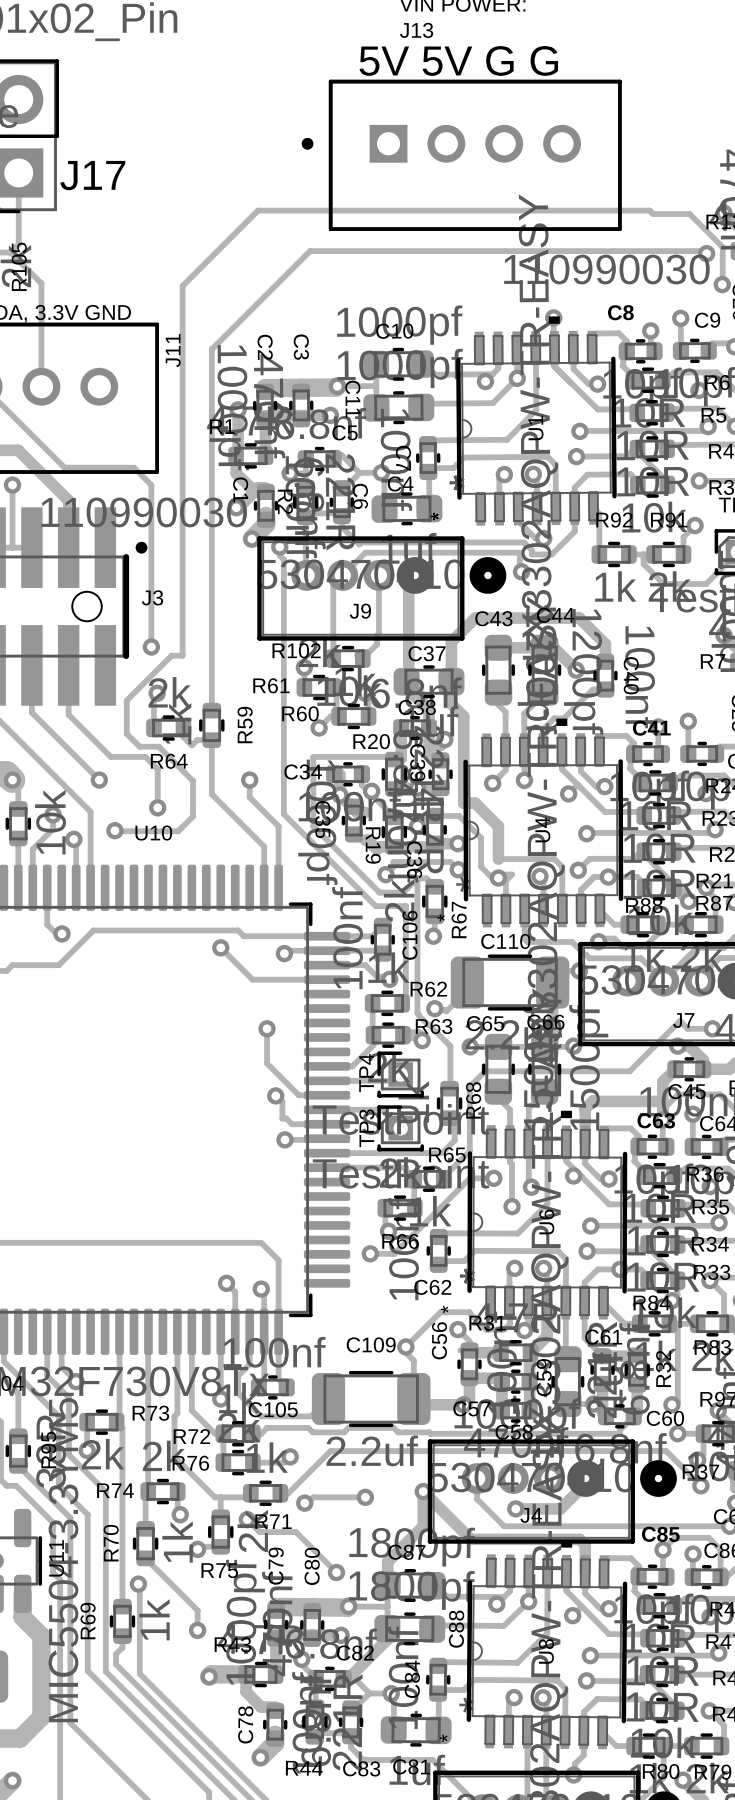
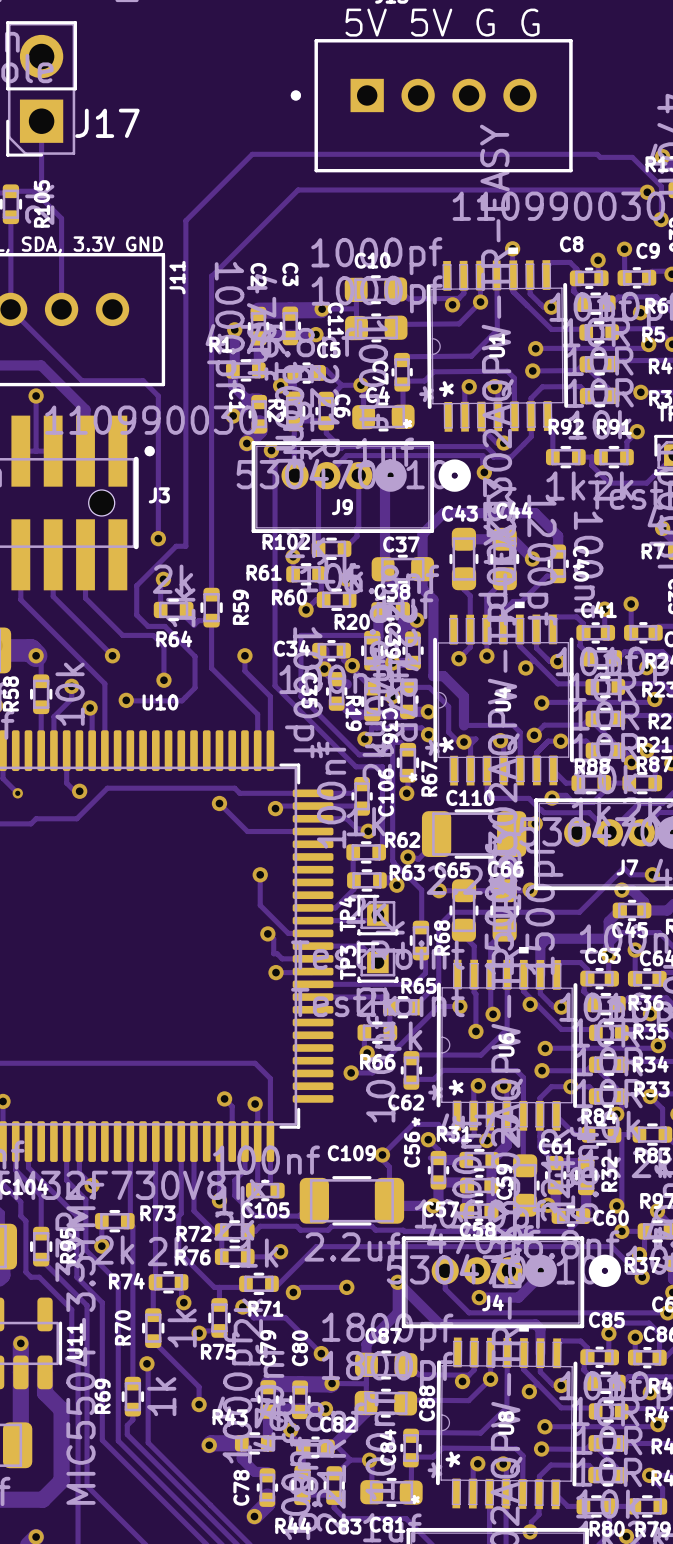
U1 footprint: [456, 316, 617, 526] -> [426, 247, 569, 432]
U4 text: none -> * (446, 744)
U6 footprint: [467, 1110, 628, 1320] -> [436, 946, 578, 1131]
U8 text: none -> * (452, 1459)

